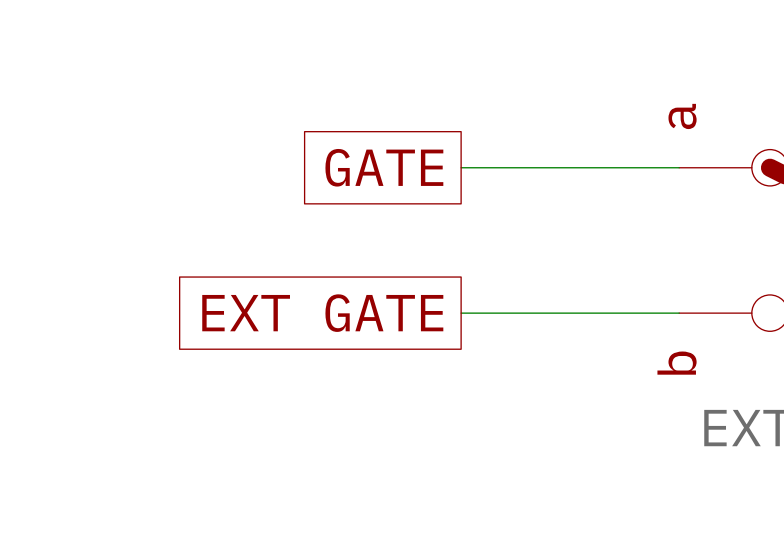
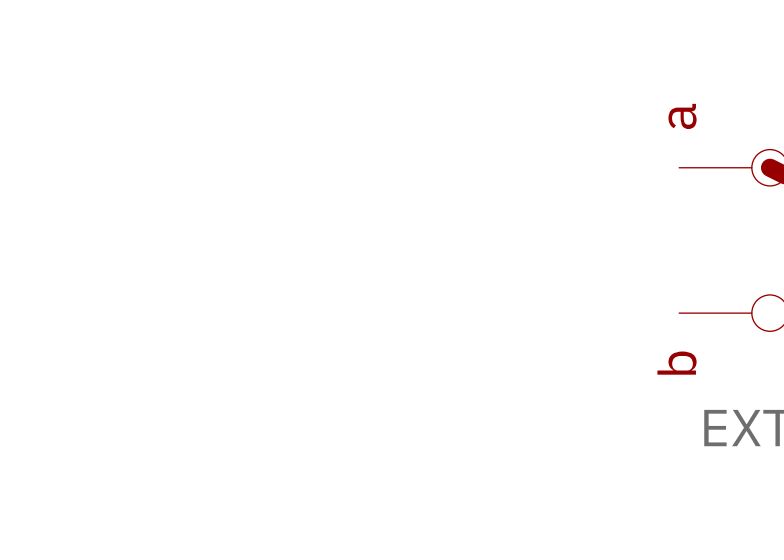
global label: GATE (384, 167) -> none
wire: (461, 167) (679, 167) -> none
global label: EXT GATE (322, 313) -> none
wire: (461, 313) (679, 313) -> none

